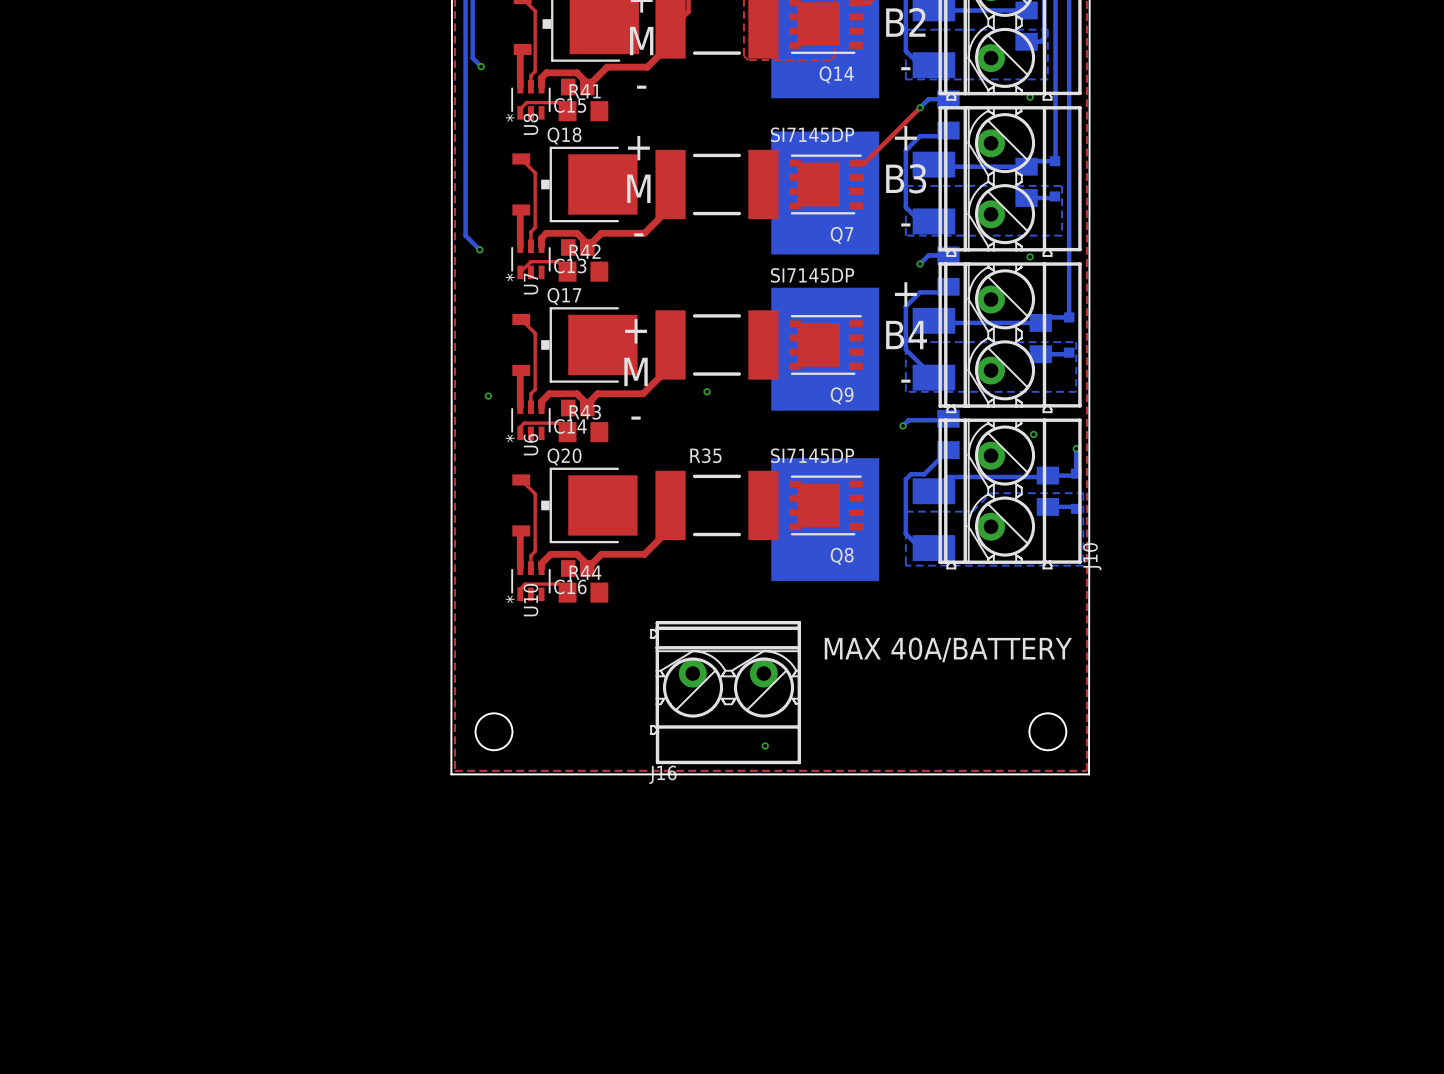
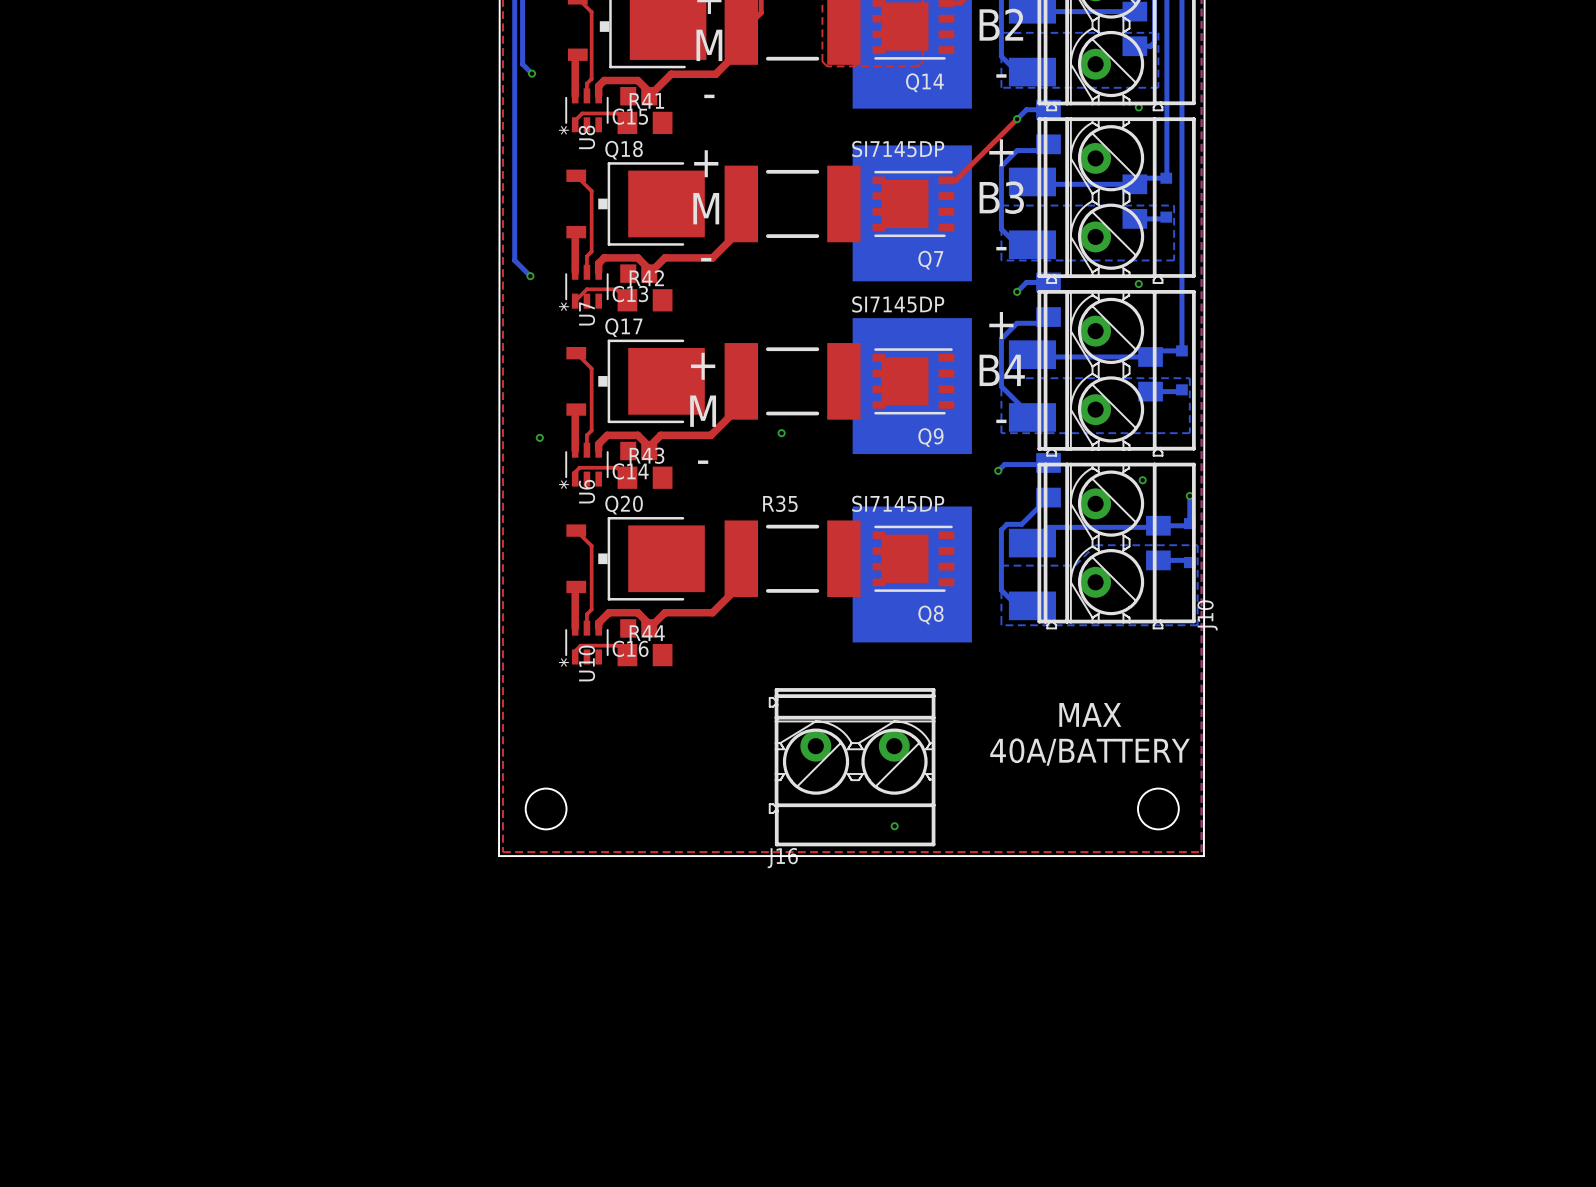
text: none -> MAX (1090, 714)
text: MAX 40A/BATTERY (948, 649) -> 40A/BATTERY (1090, 752)
J16 position: (725, 692) -> (852, 767)
via position: (765, 745) -> (894, 826)

